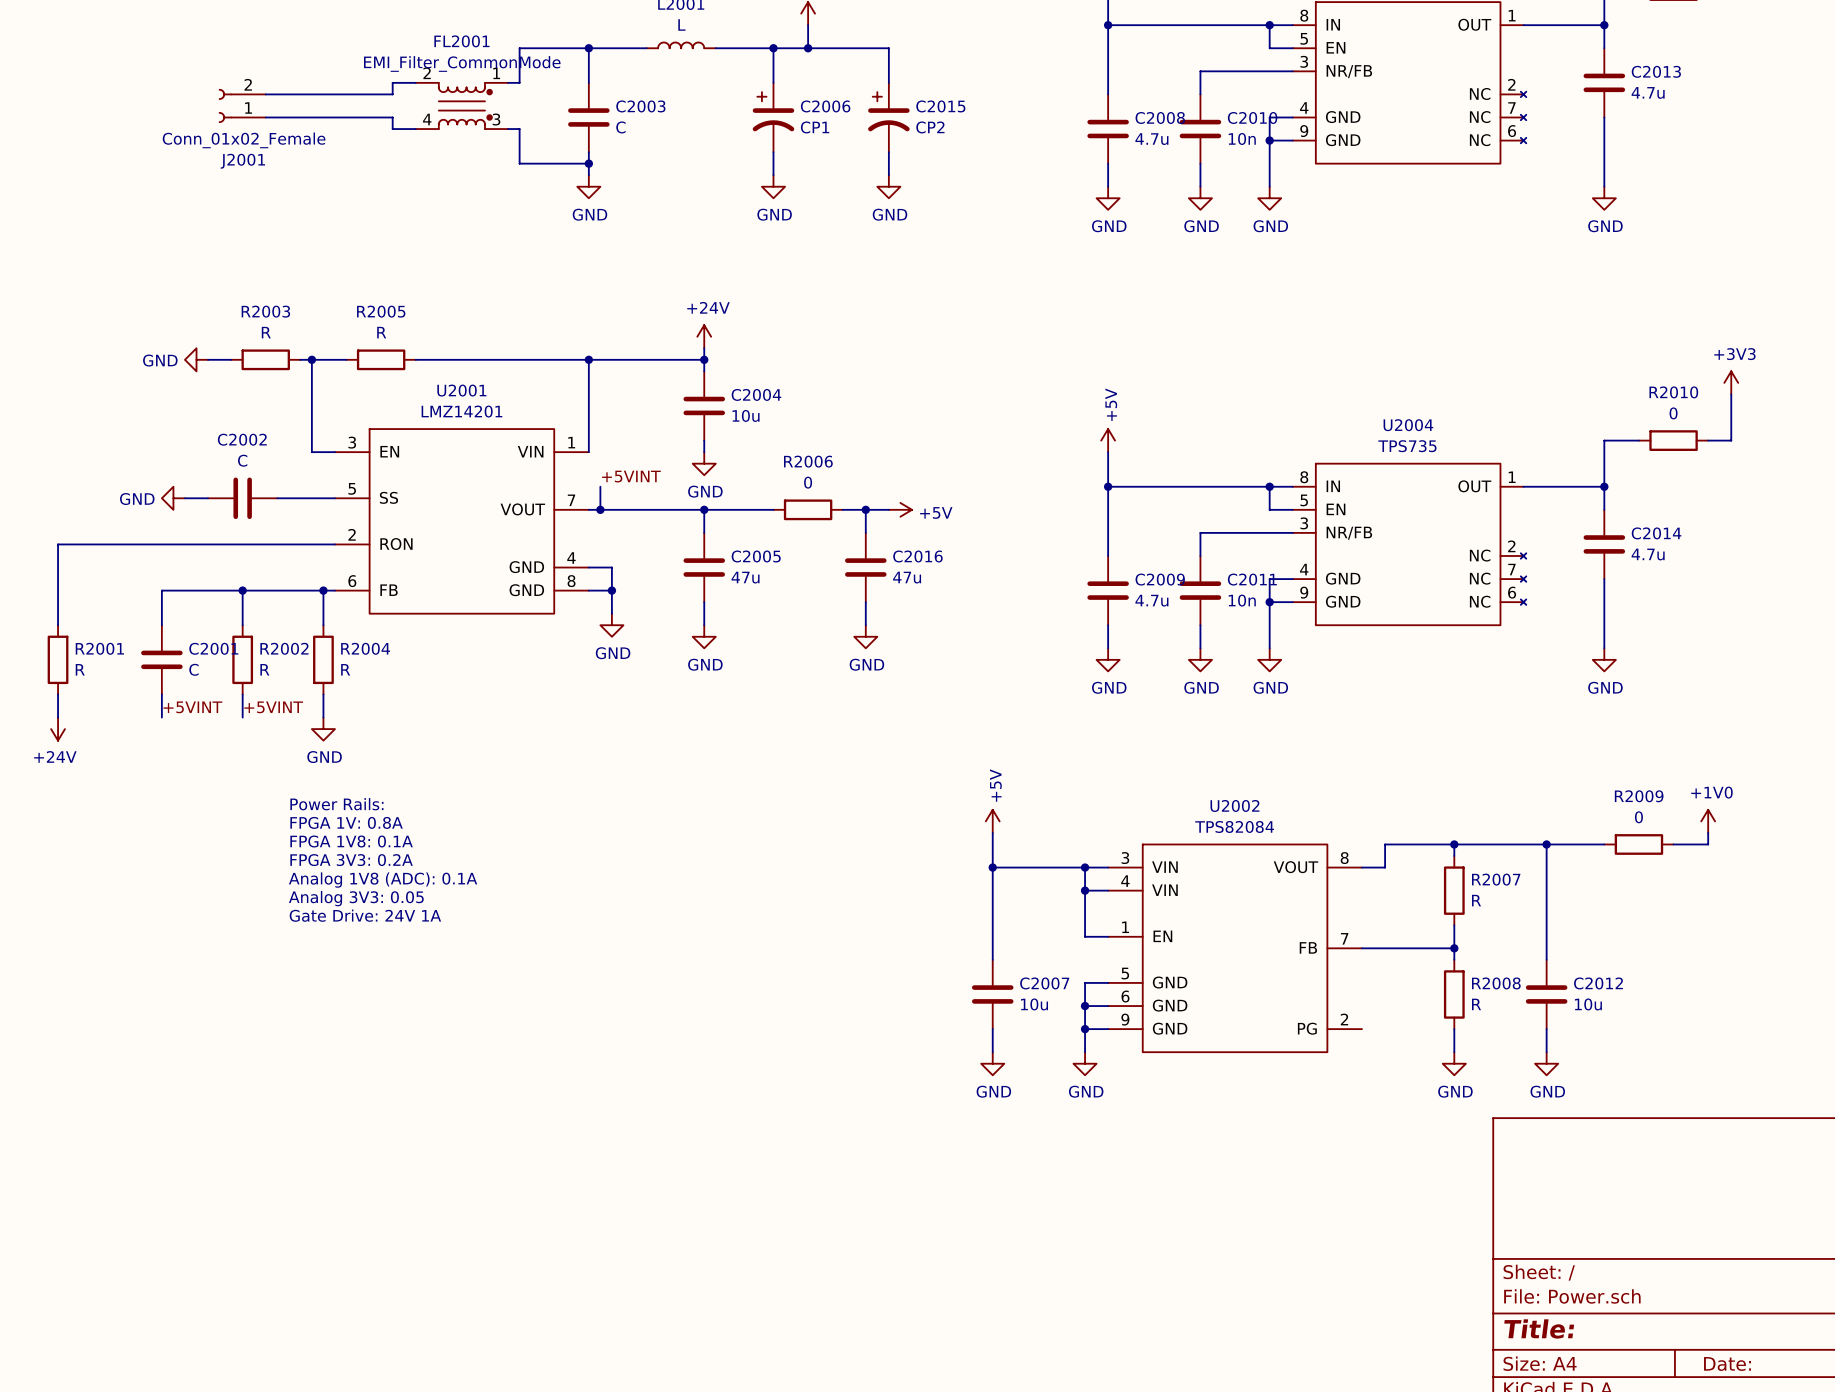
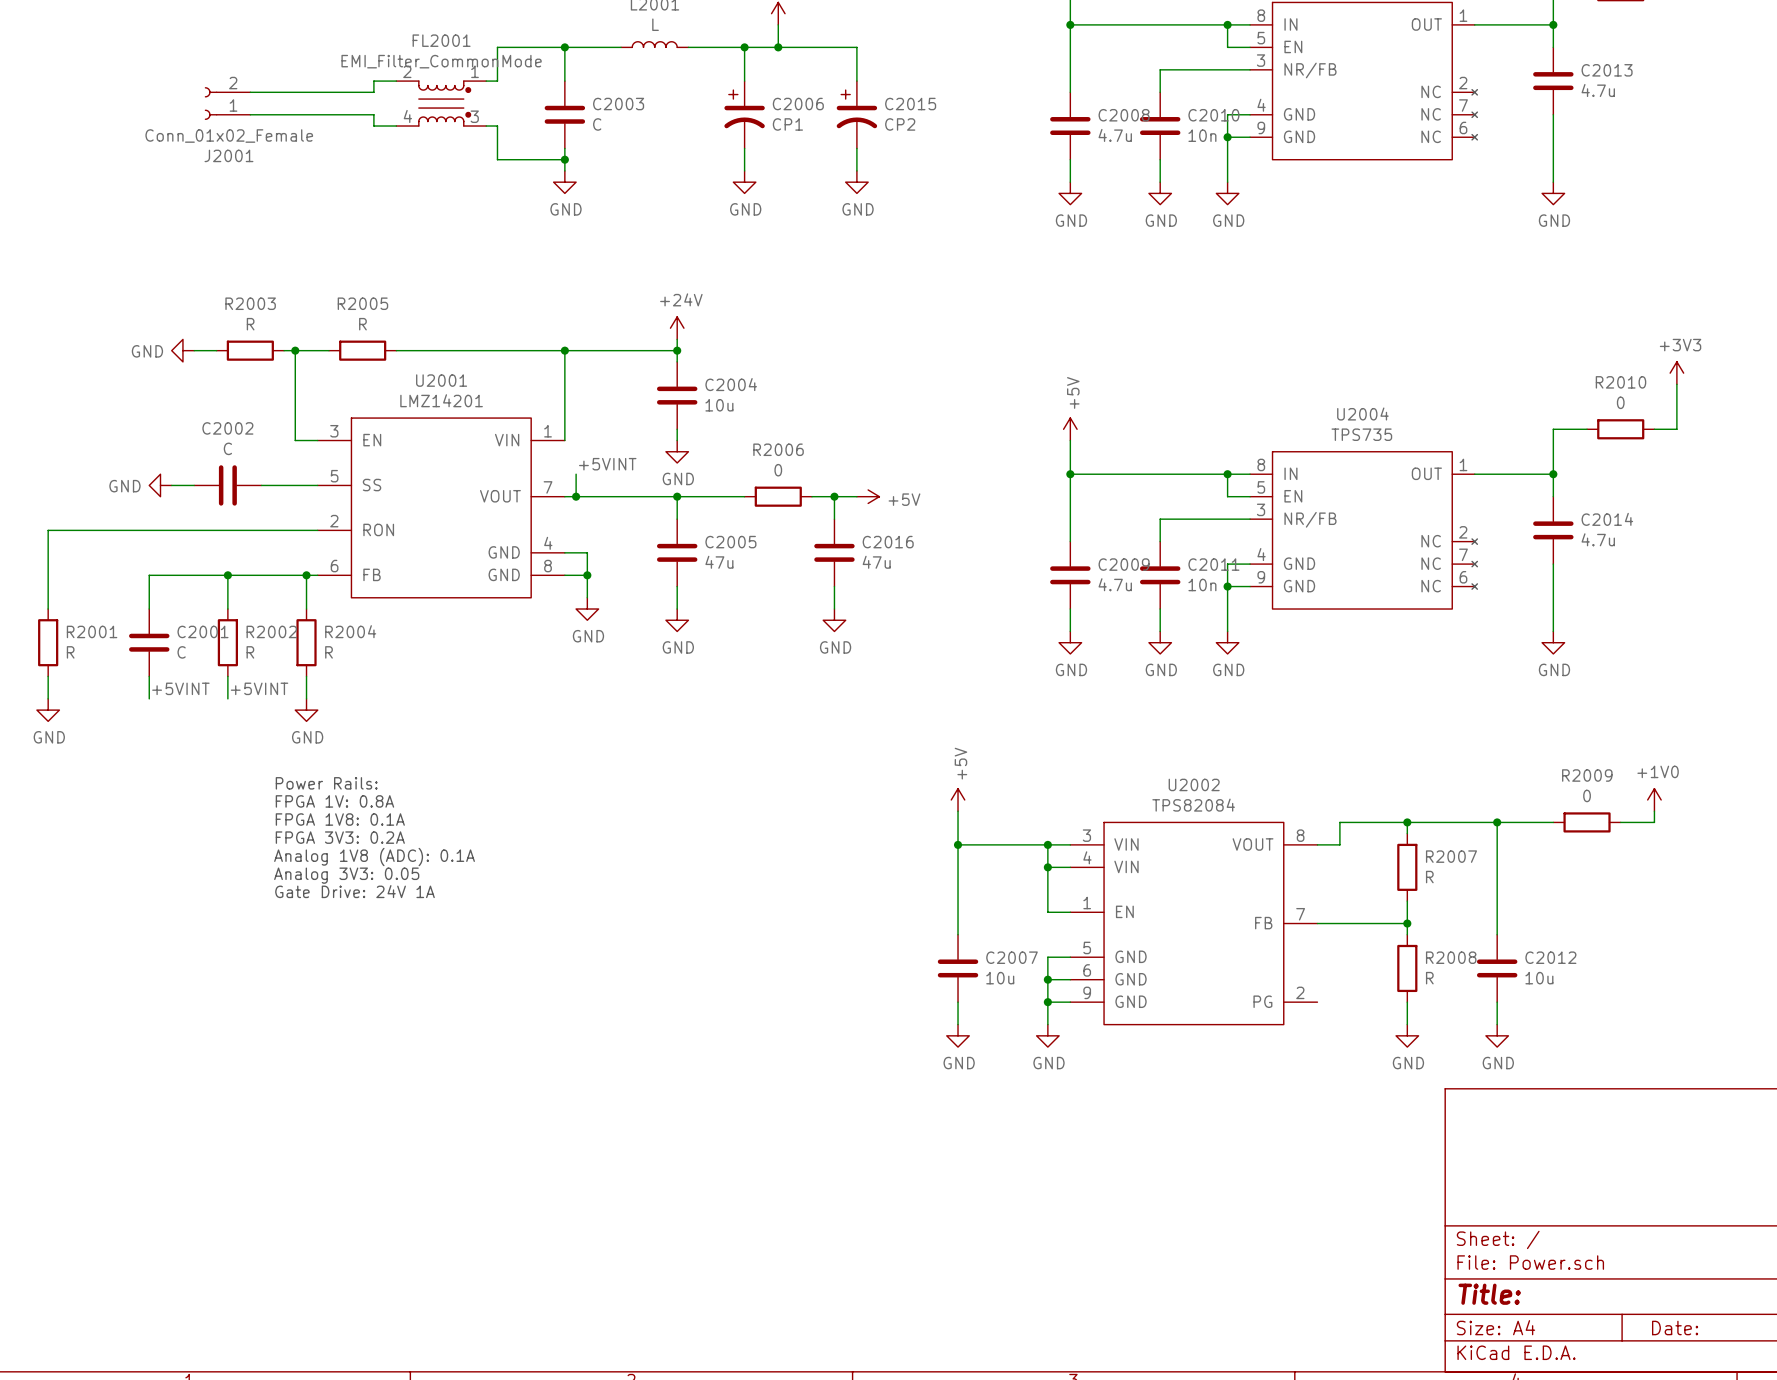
power symbol: +24V (58, 729) -> GND (48, 710)

